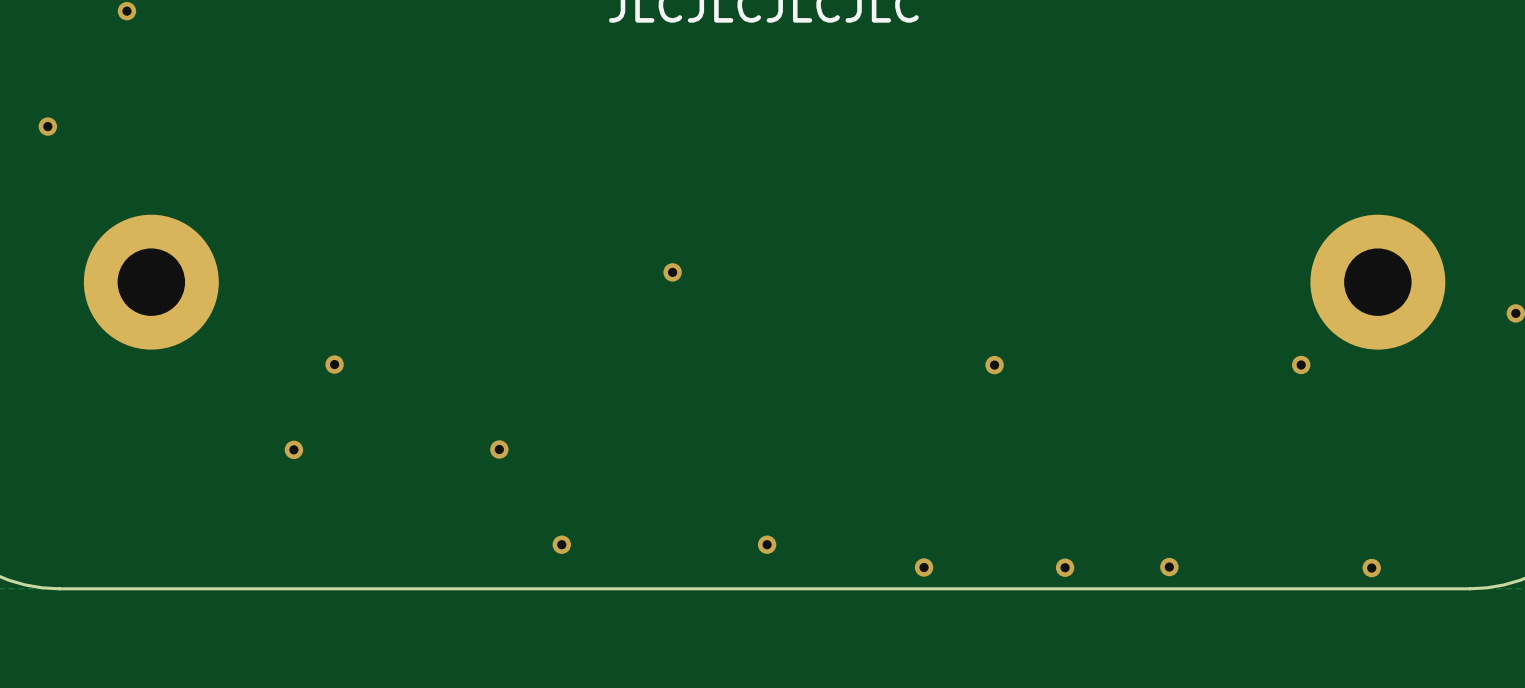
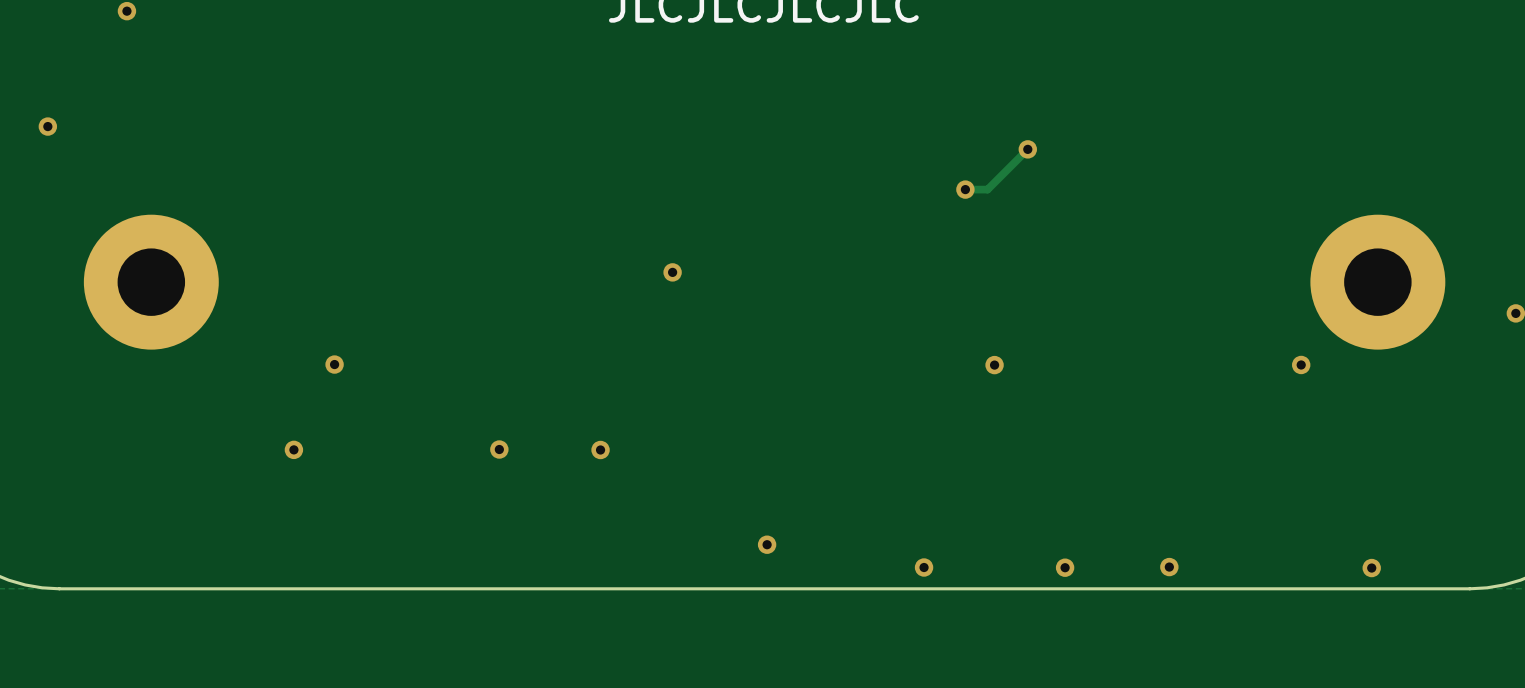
track: none -> (1027, 149) (987, 189) (965, 189)
via: none -> (1027, 149)
via: none -> (965, 189)
via position: (561, 544) -> (600, 449)

